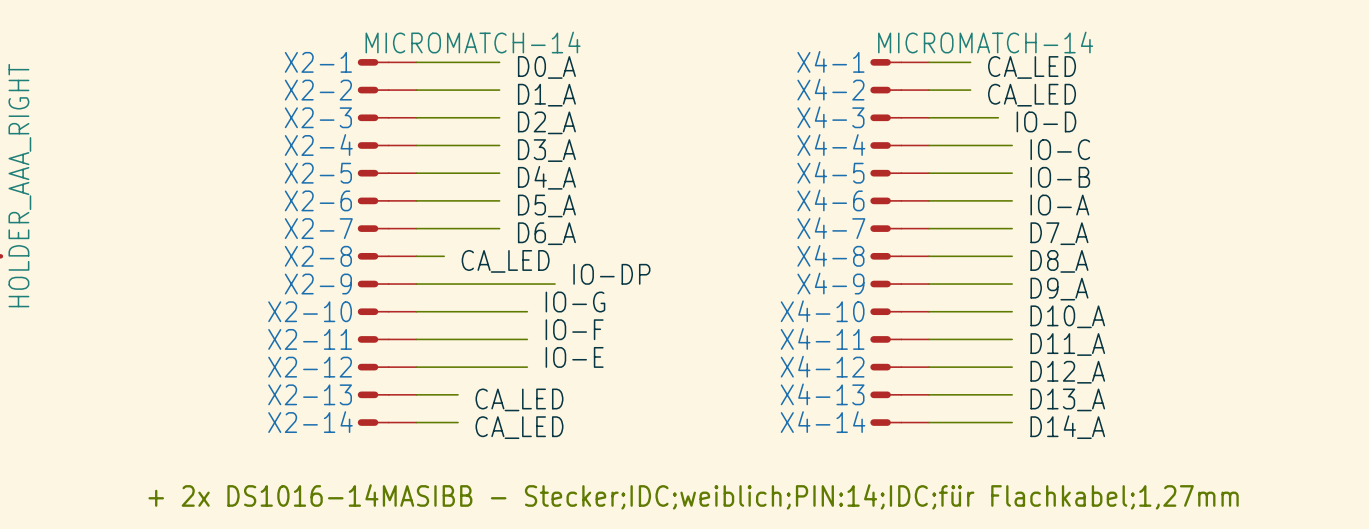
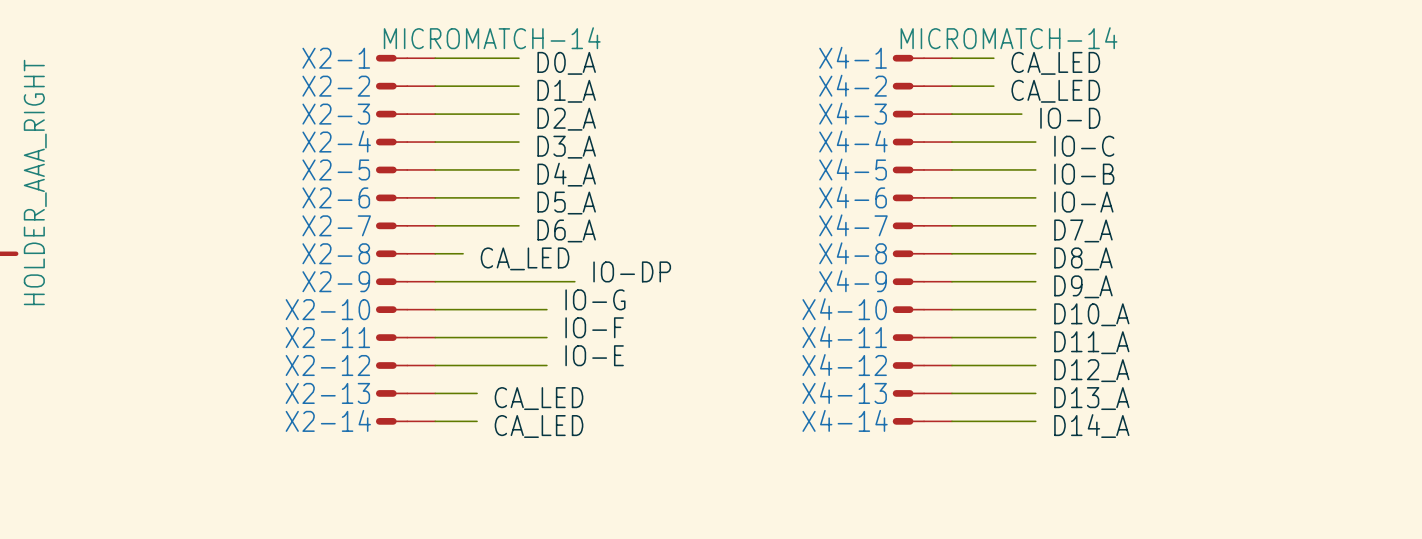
text: + 2x DS1016-14MASIBB - Stecker;IDC;weiblich;PIN:14;IDC;für Flachkabel;1,27mm (693, 496) -> none

